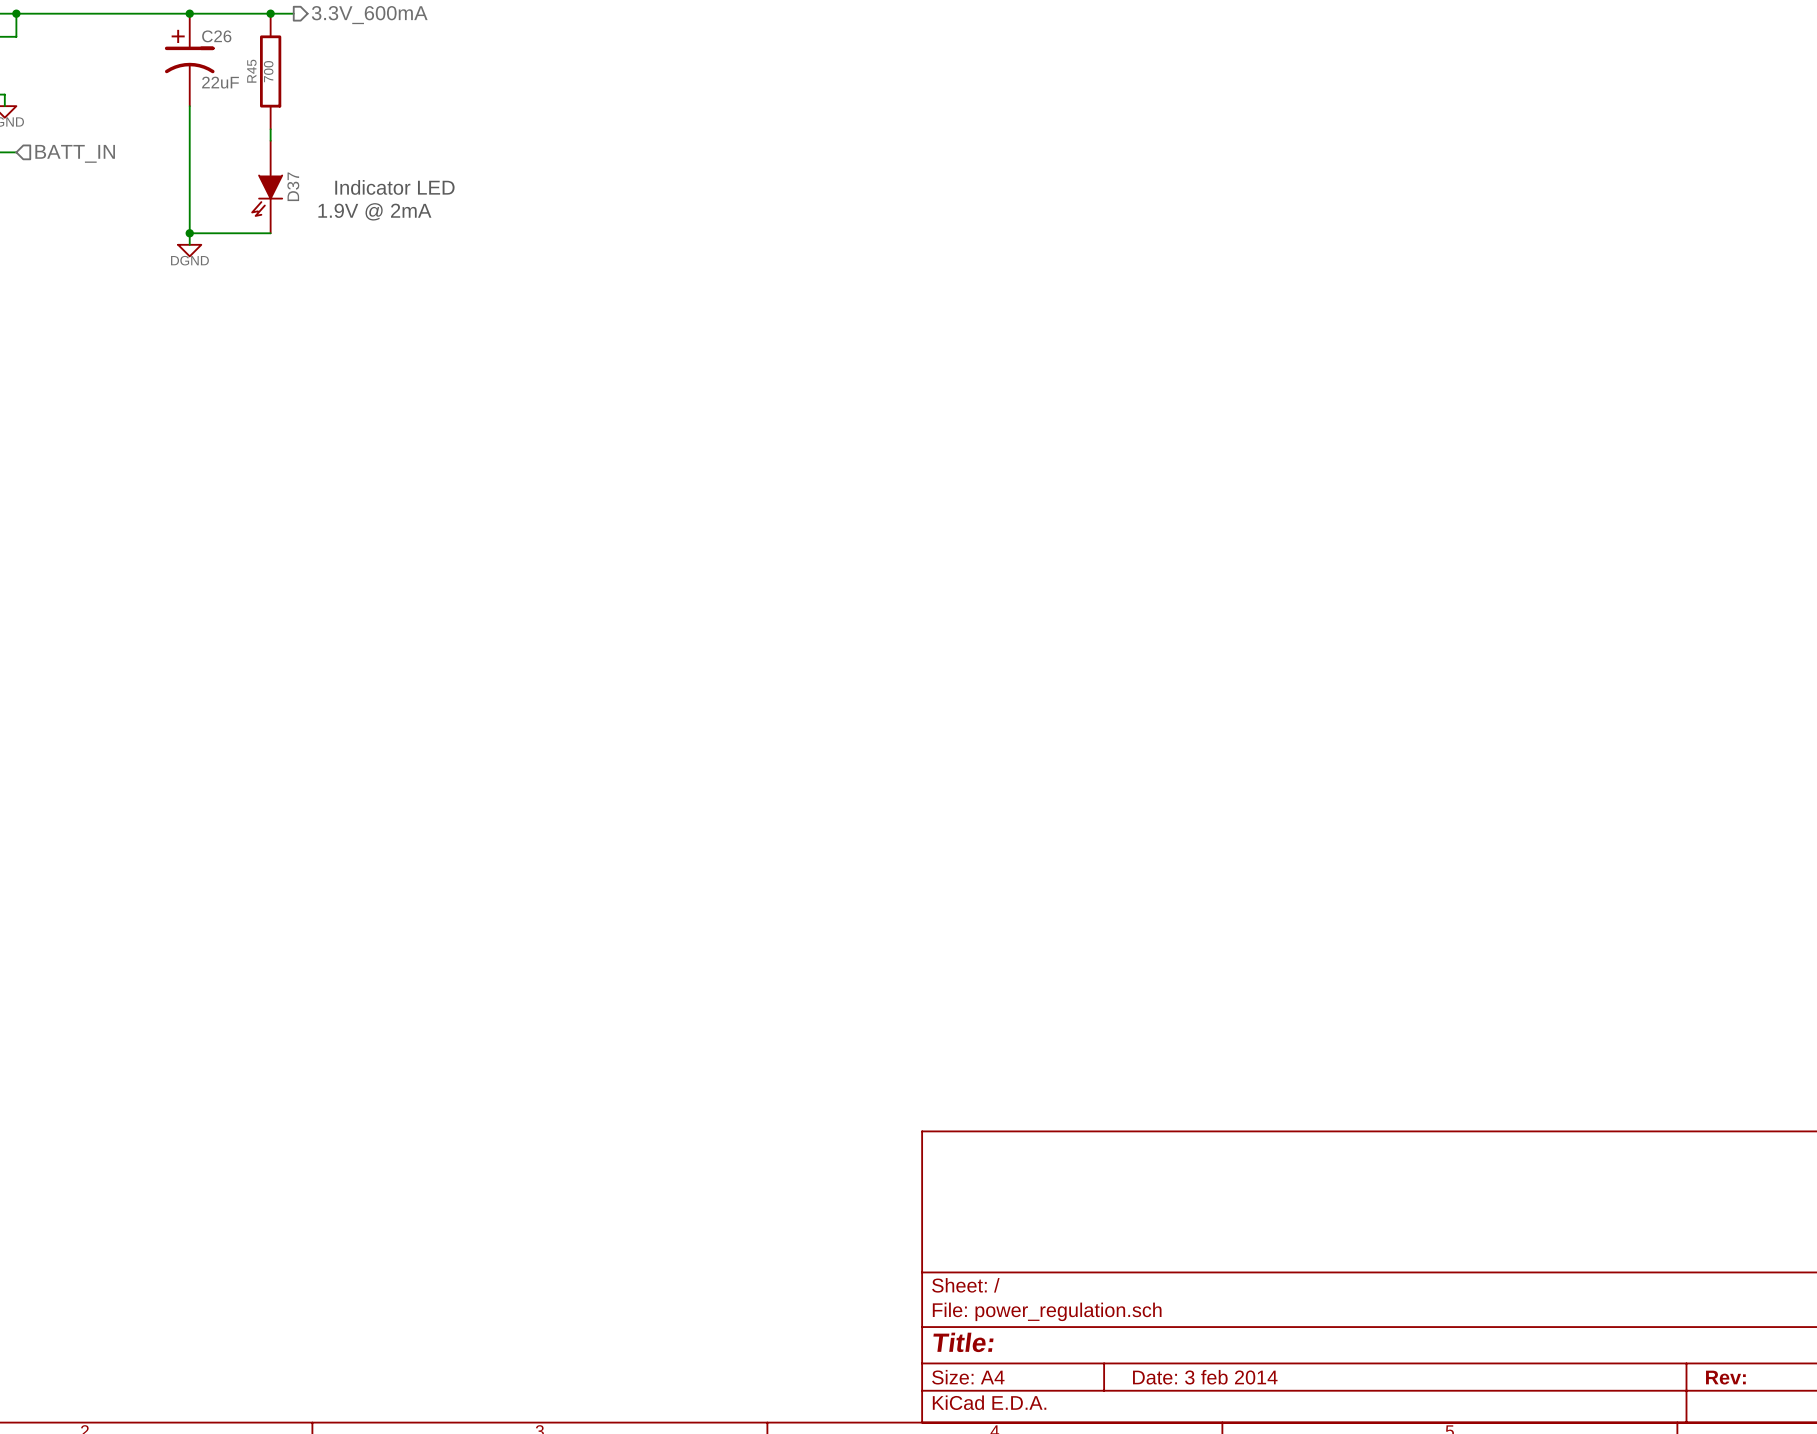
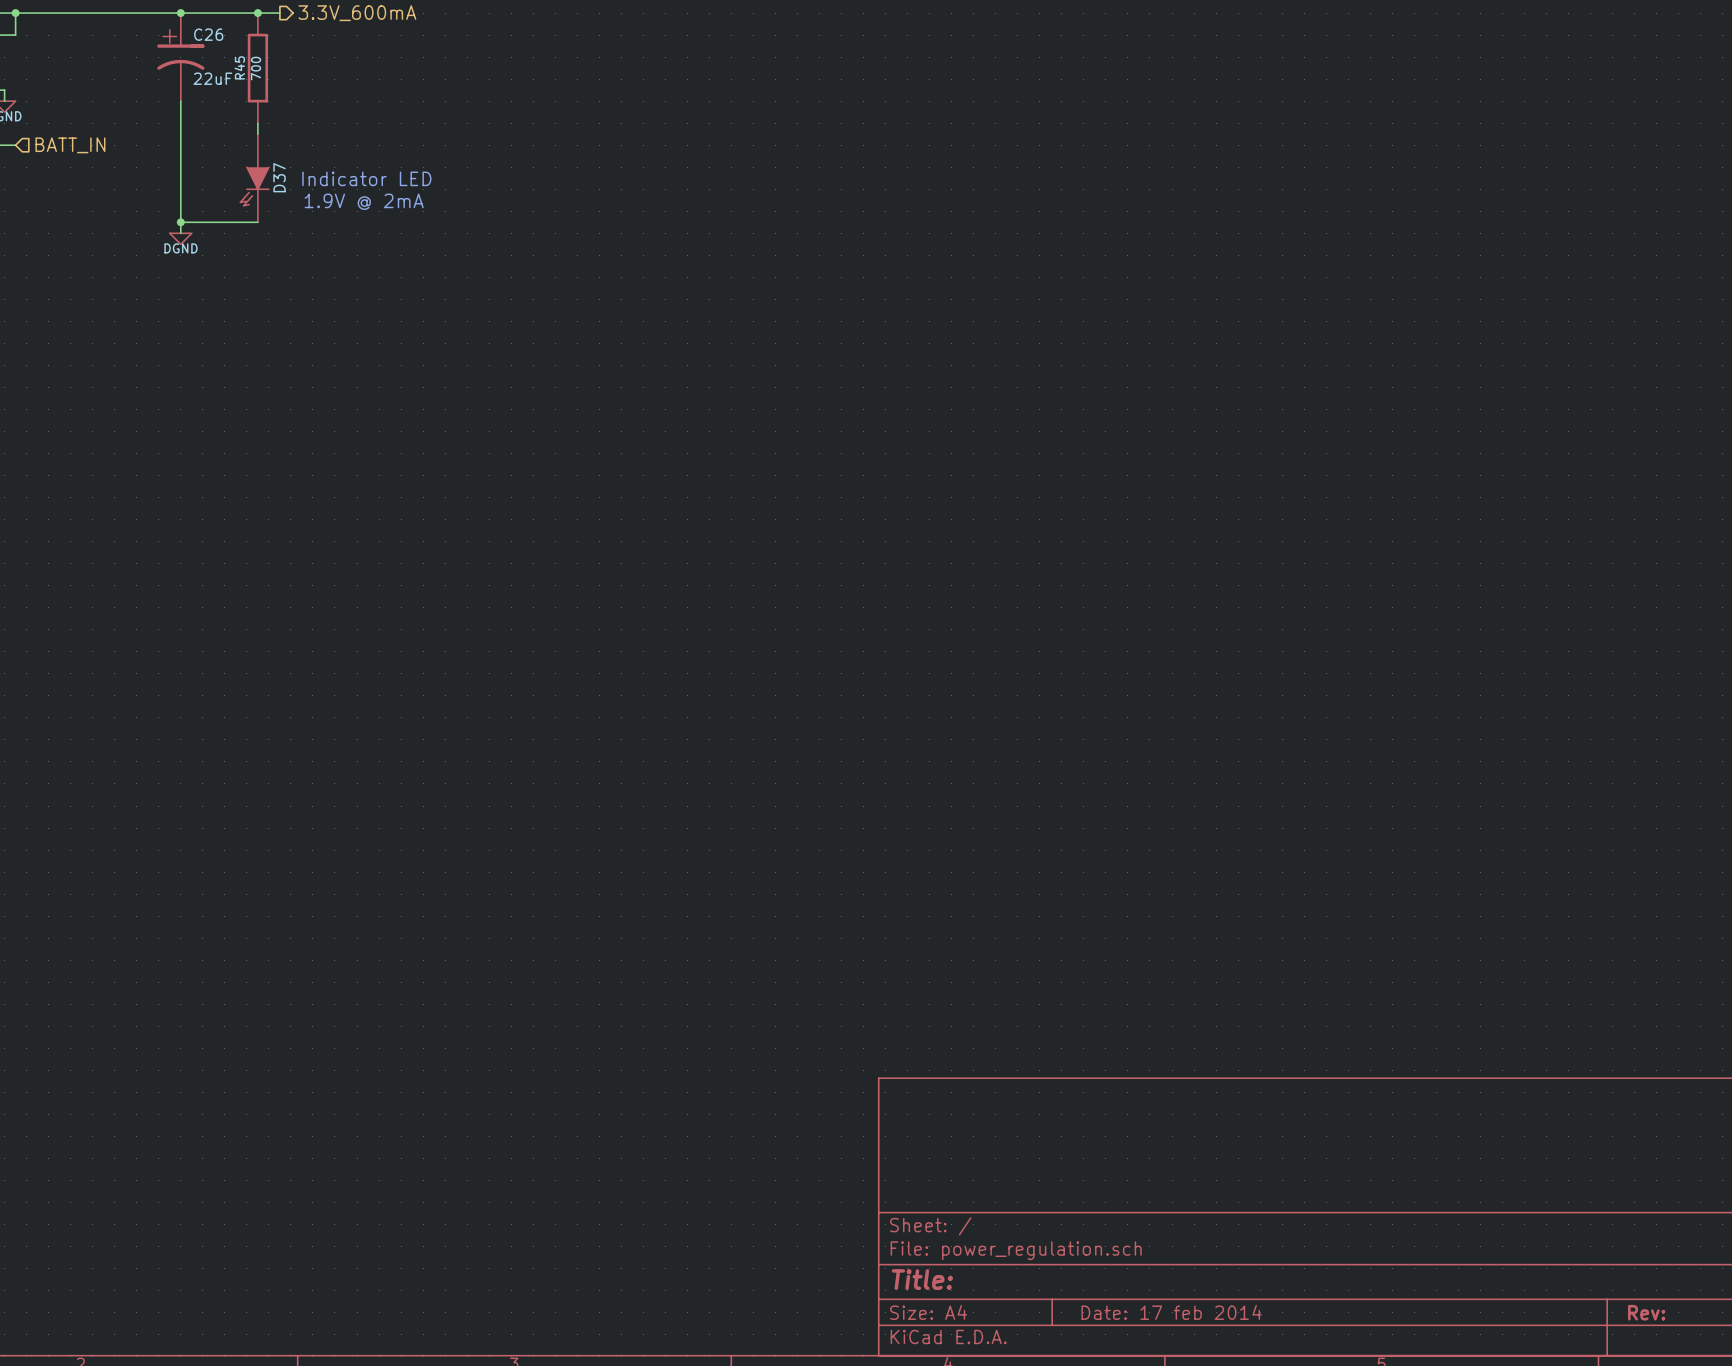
title block: Date: 3 feb 2014 (1205, 1377) -> Date: 17 feb 2014 (1171, 1312)

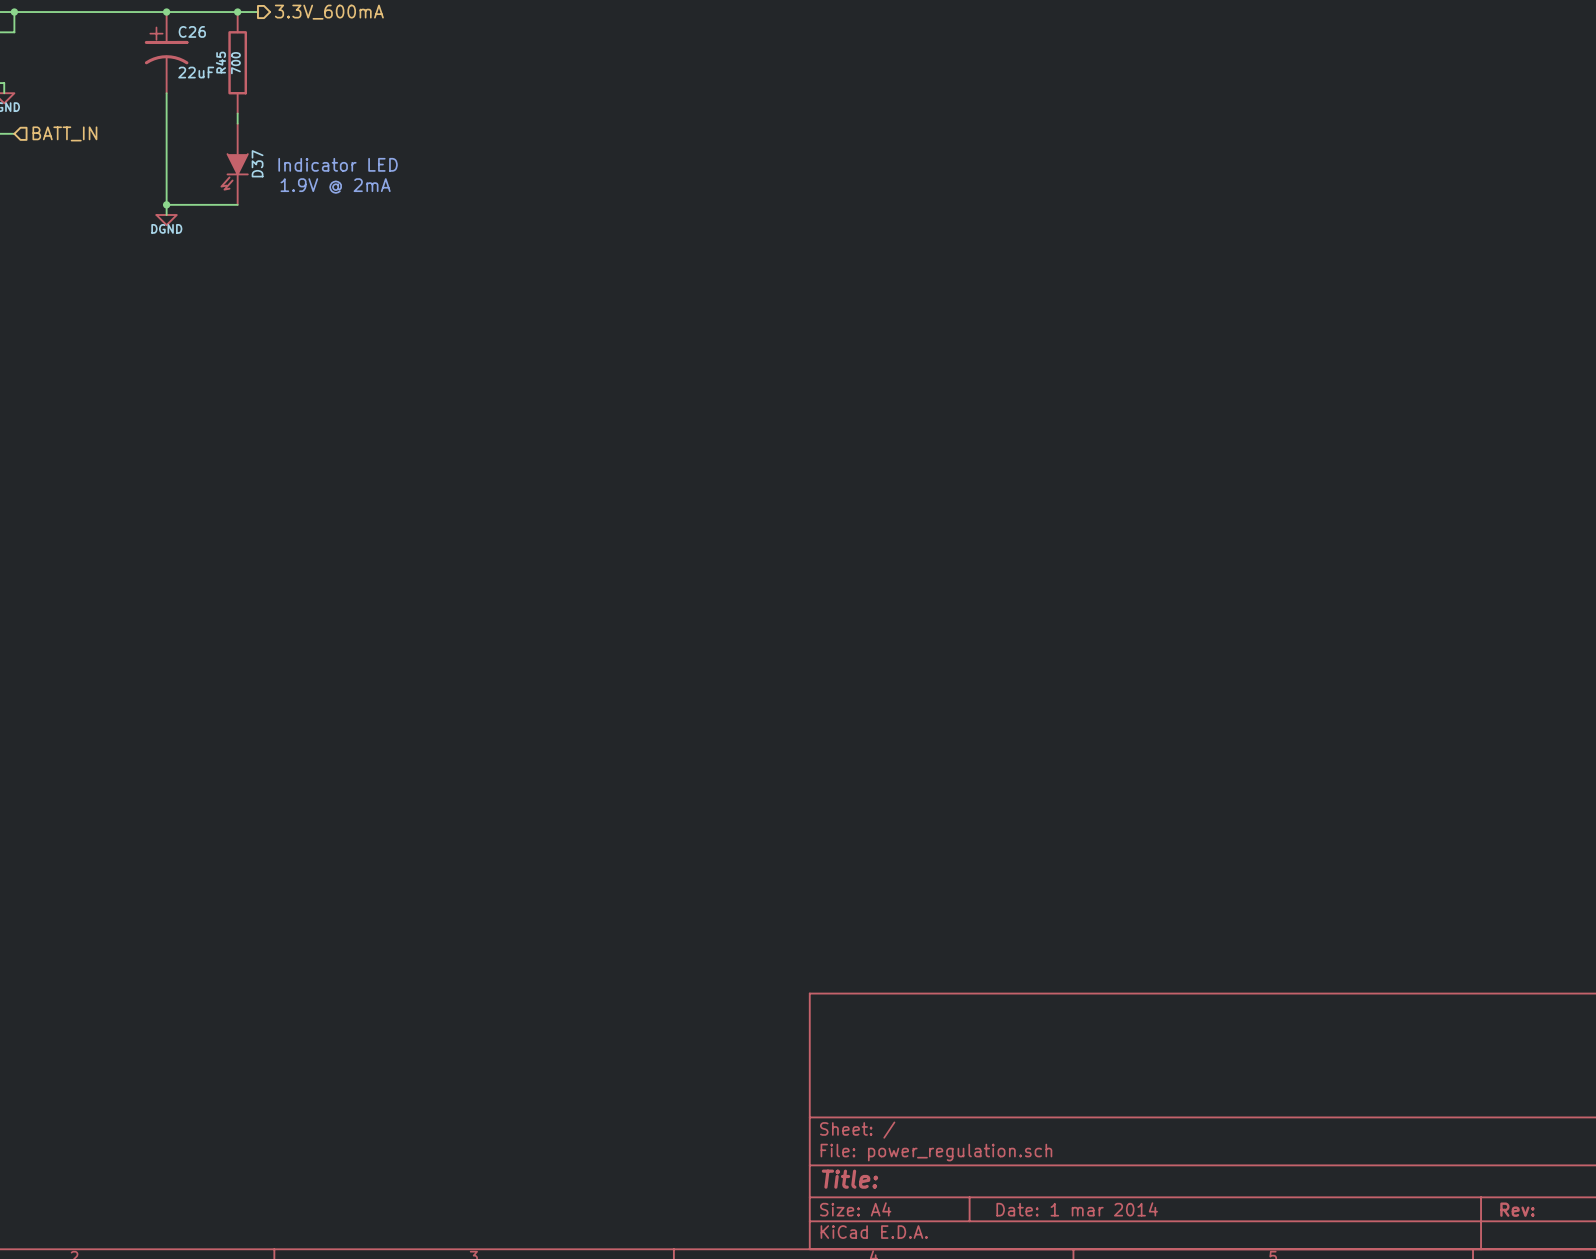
title block: Date: 17 feb 2014 (1171, 1312) -> Date: 1 mar 2014 (1077, 1209)

